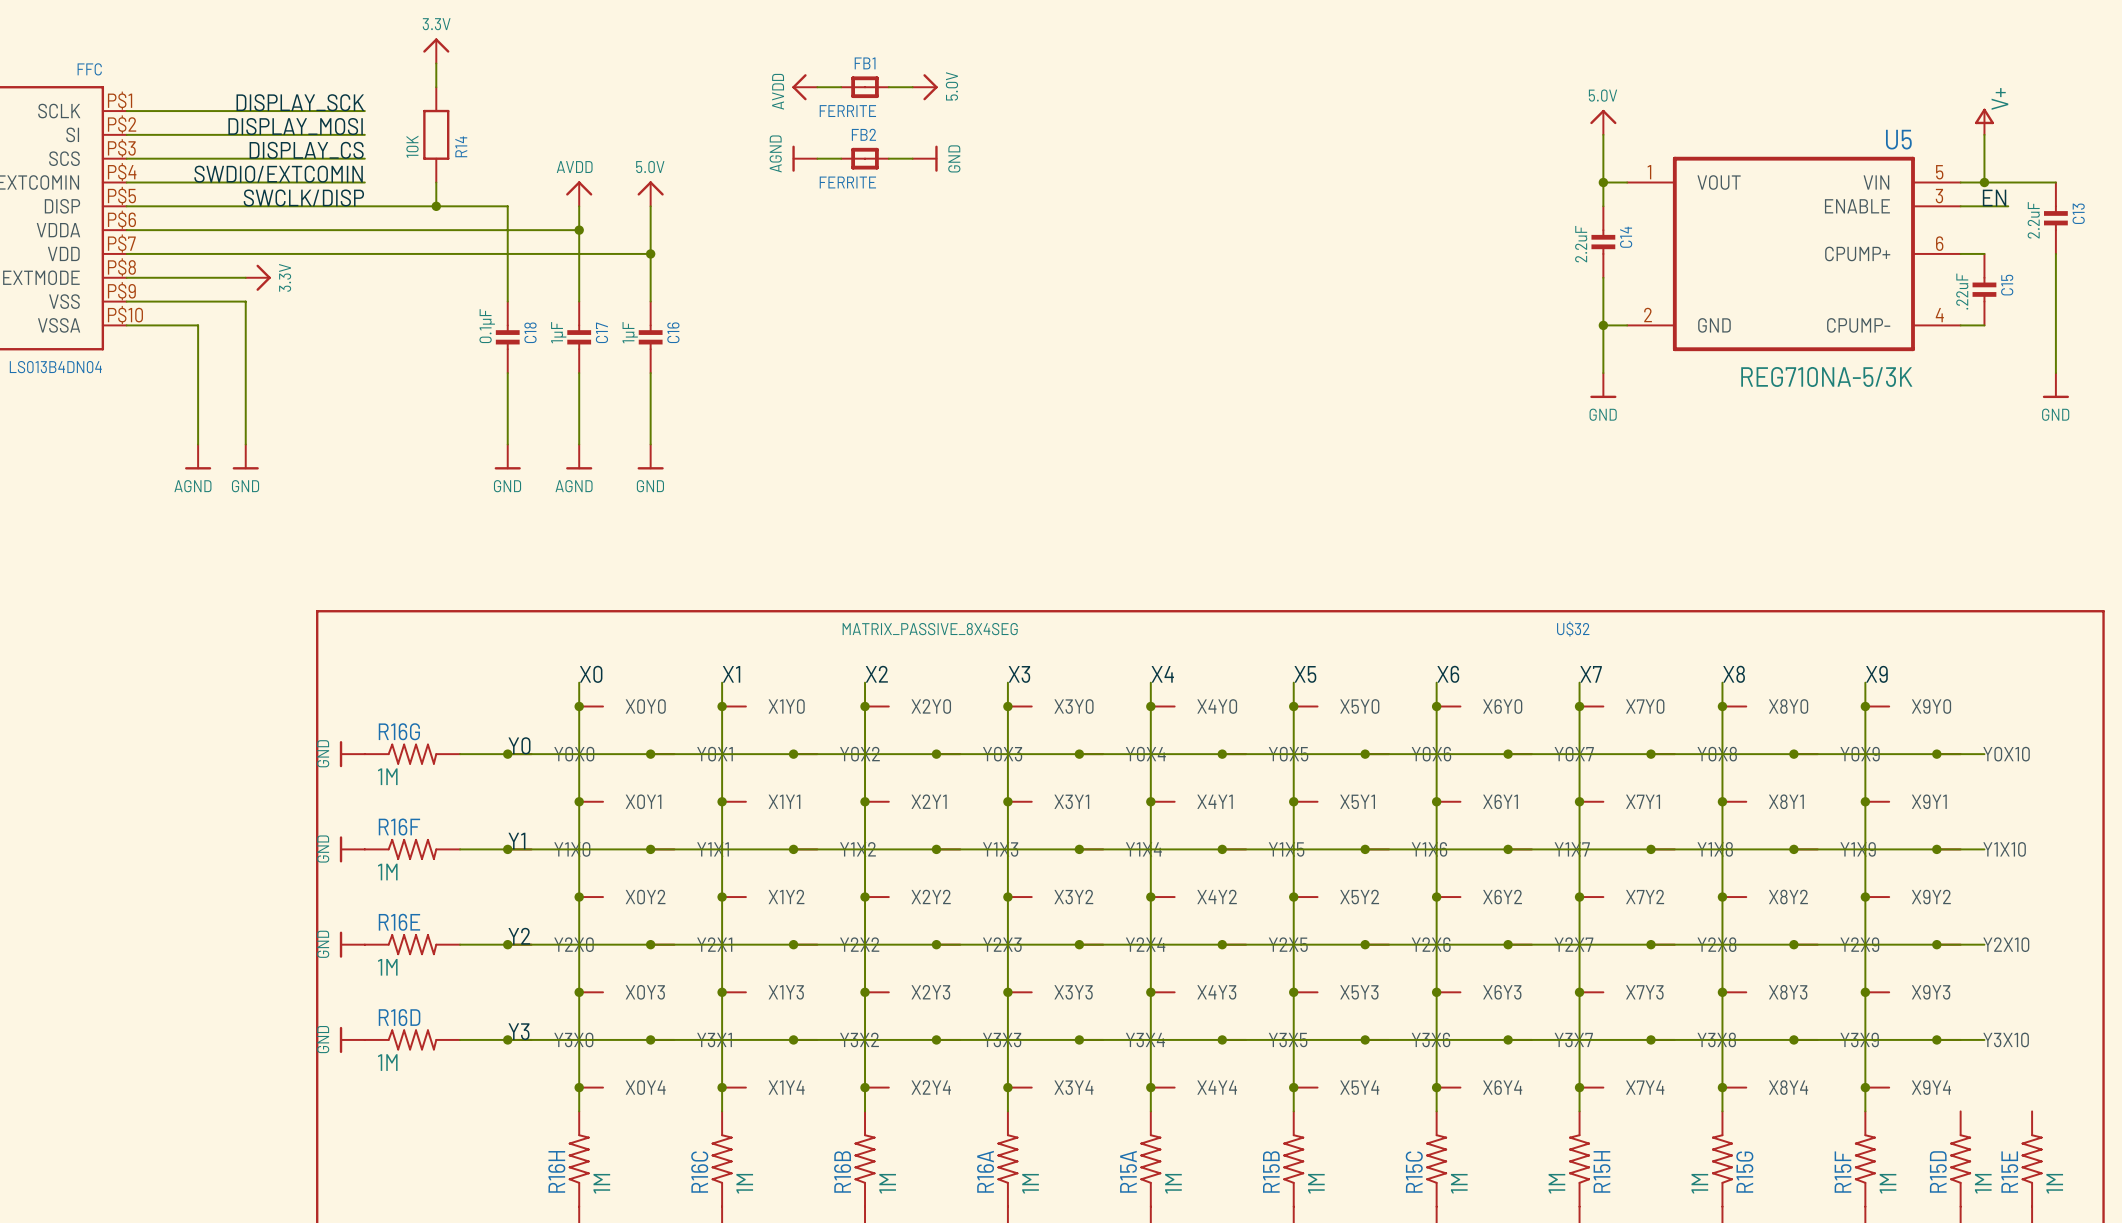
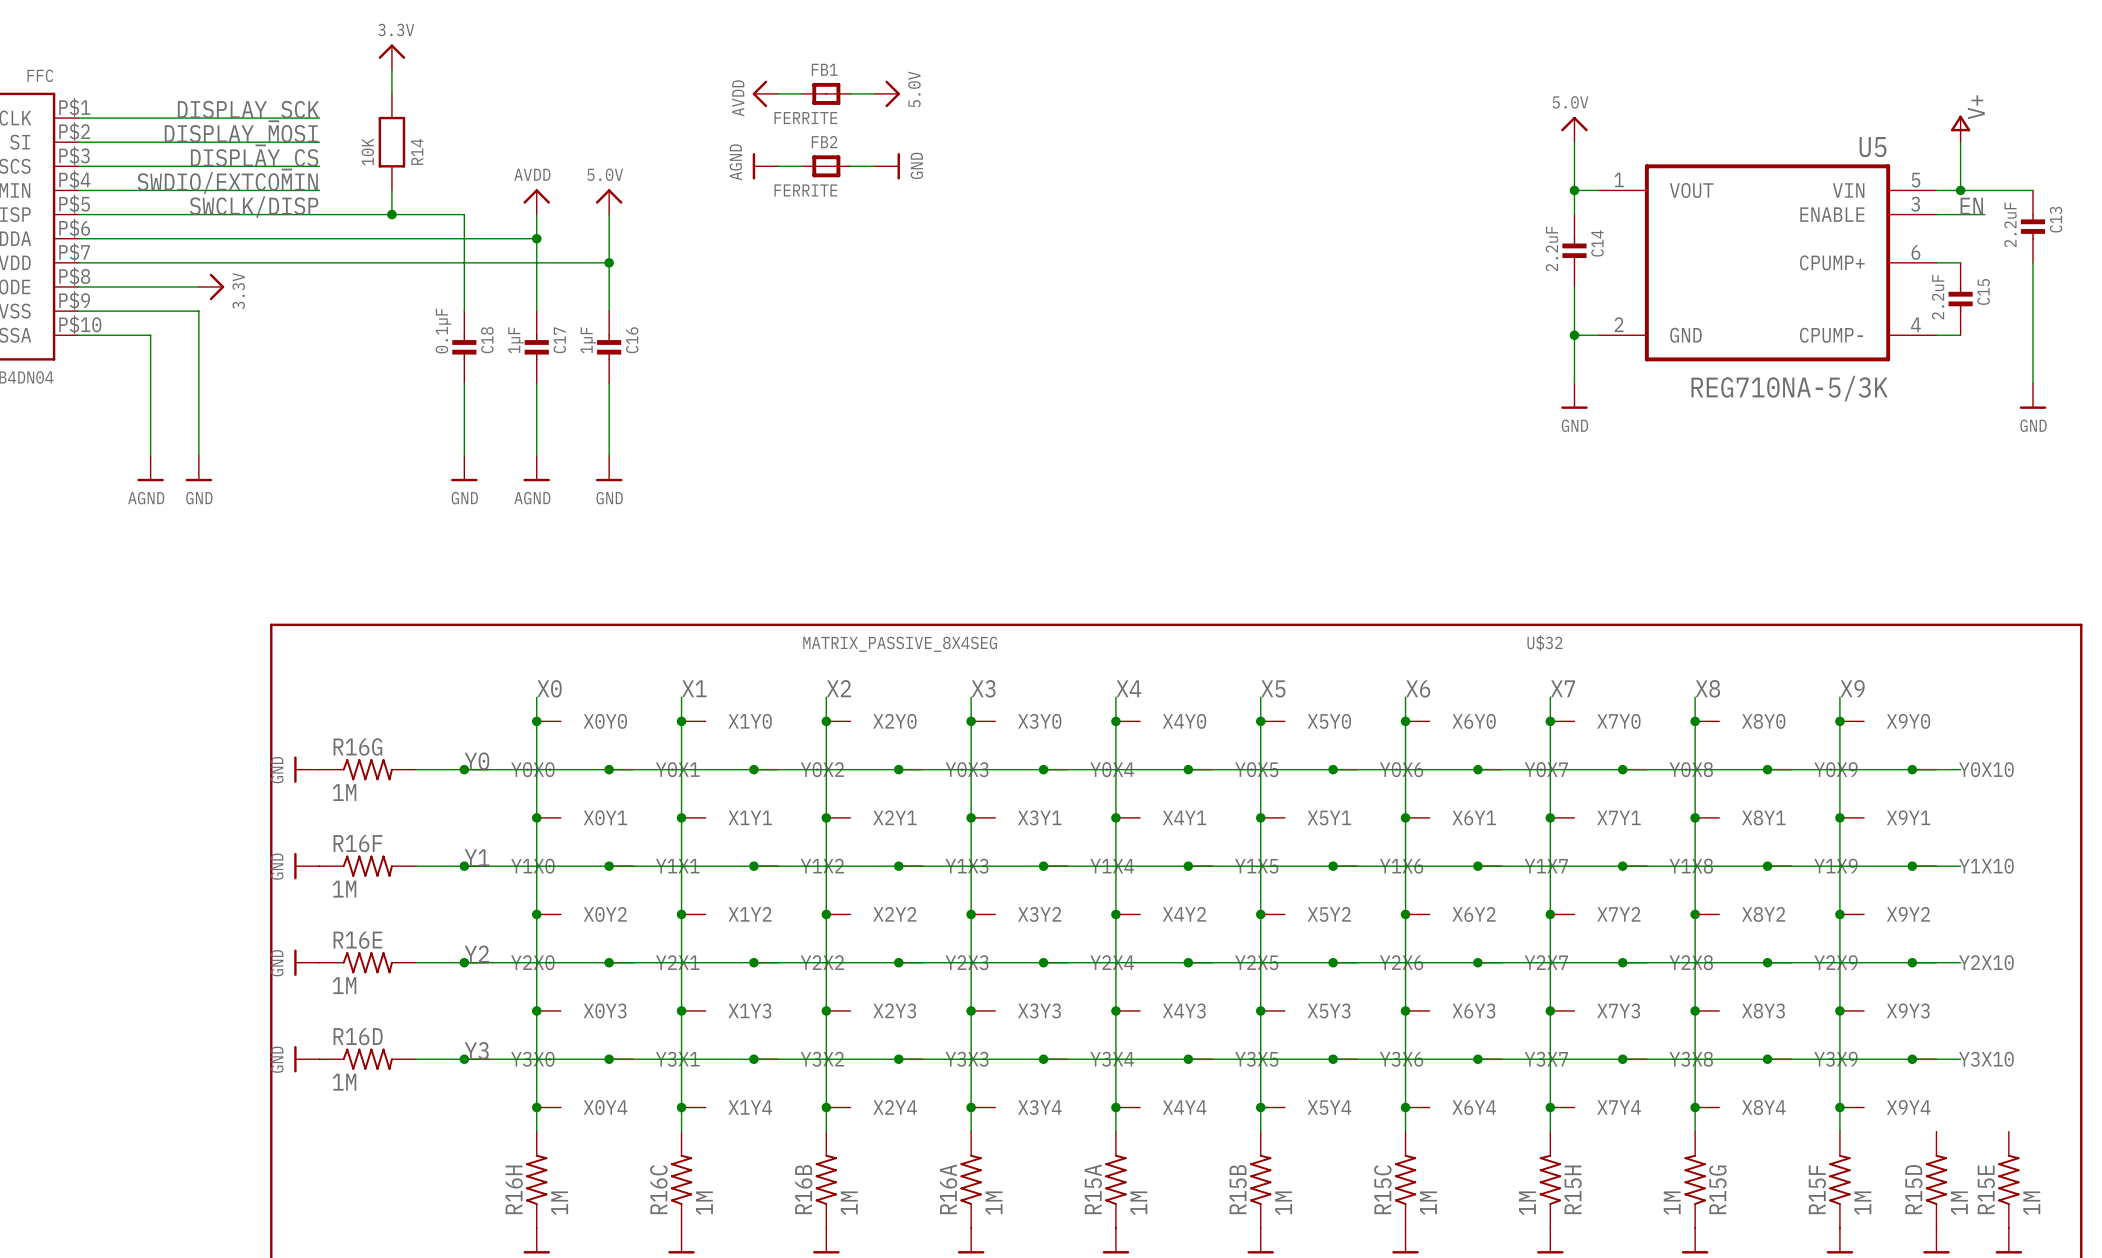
C15 value: .22uF (1962, 291) -> 2.2uF (1938, 297)

